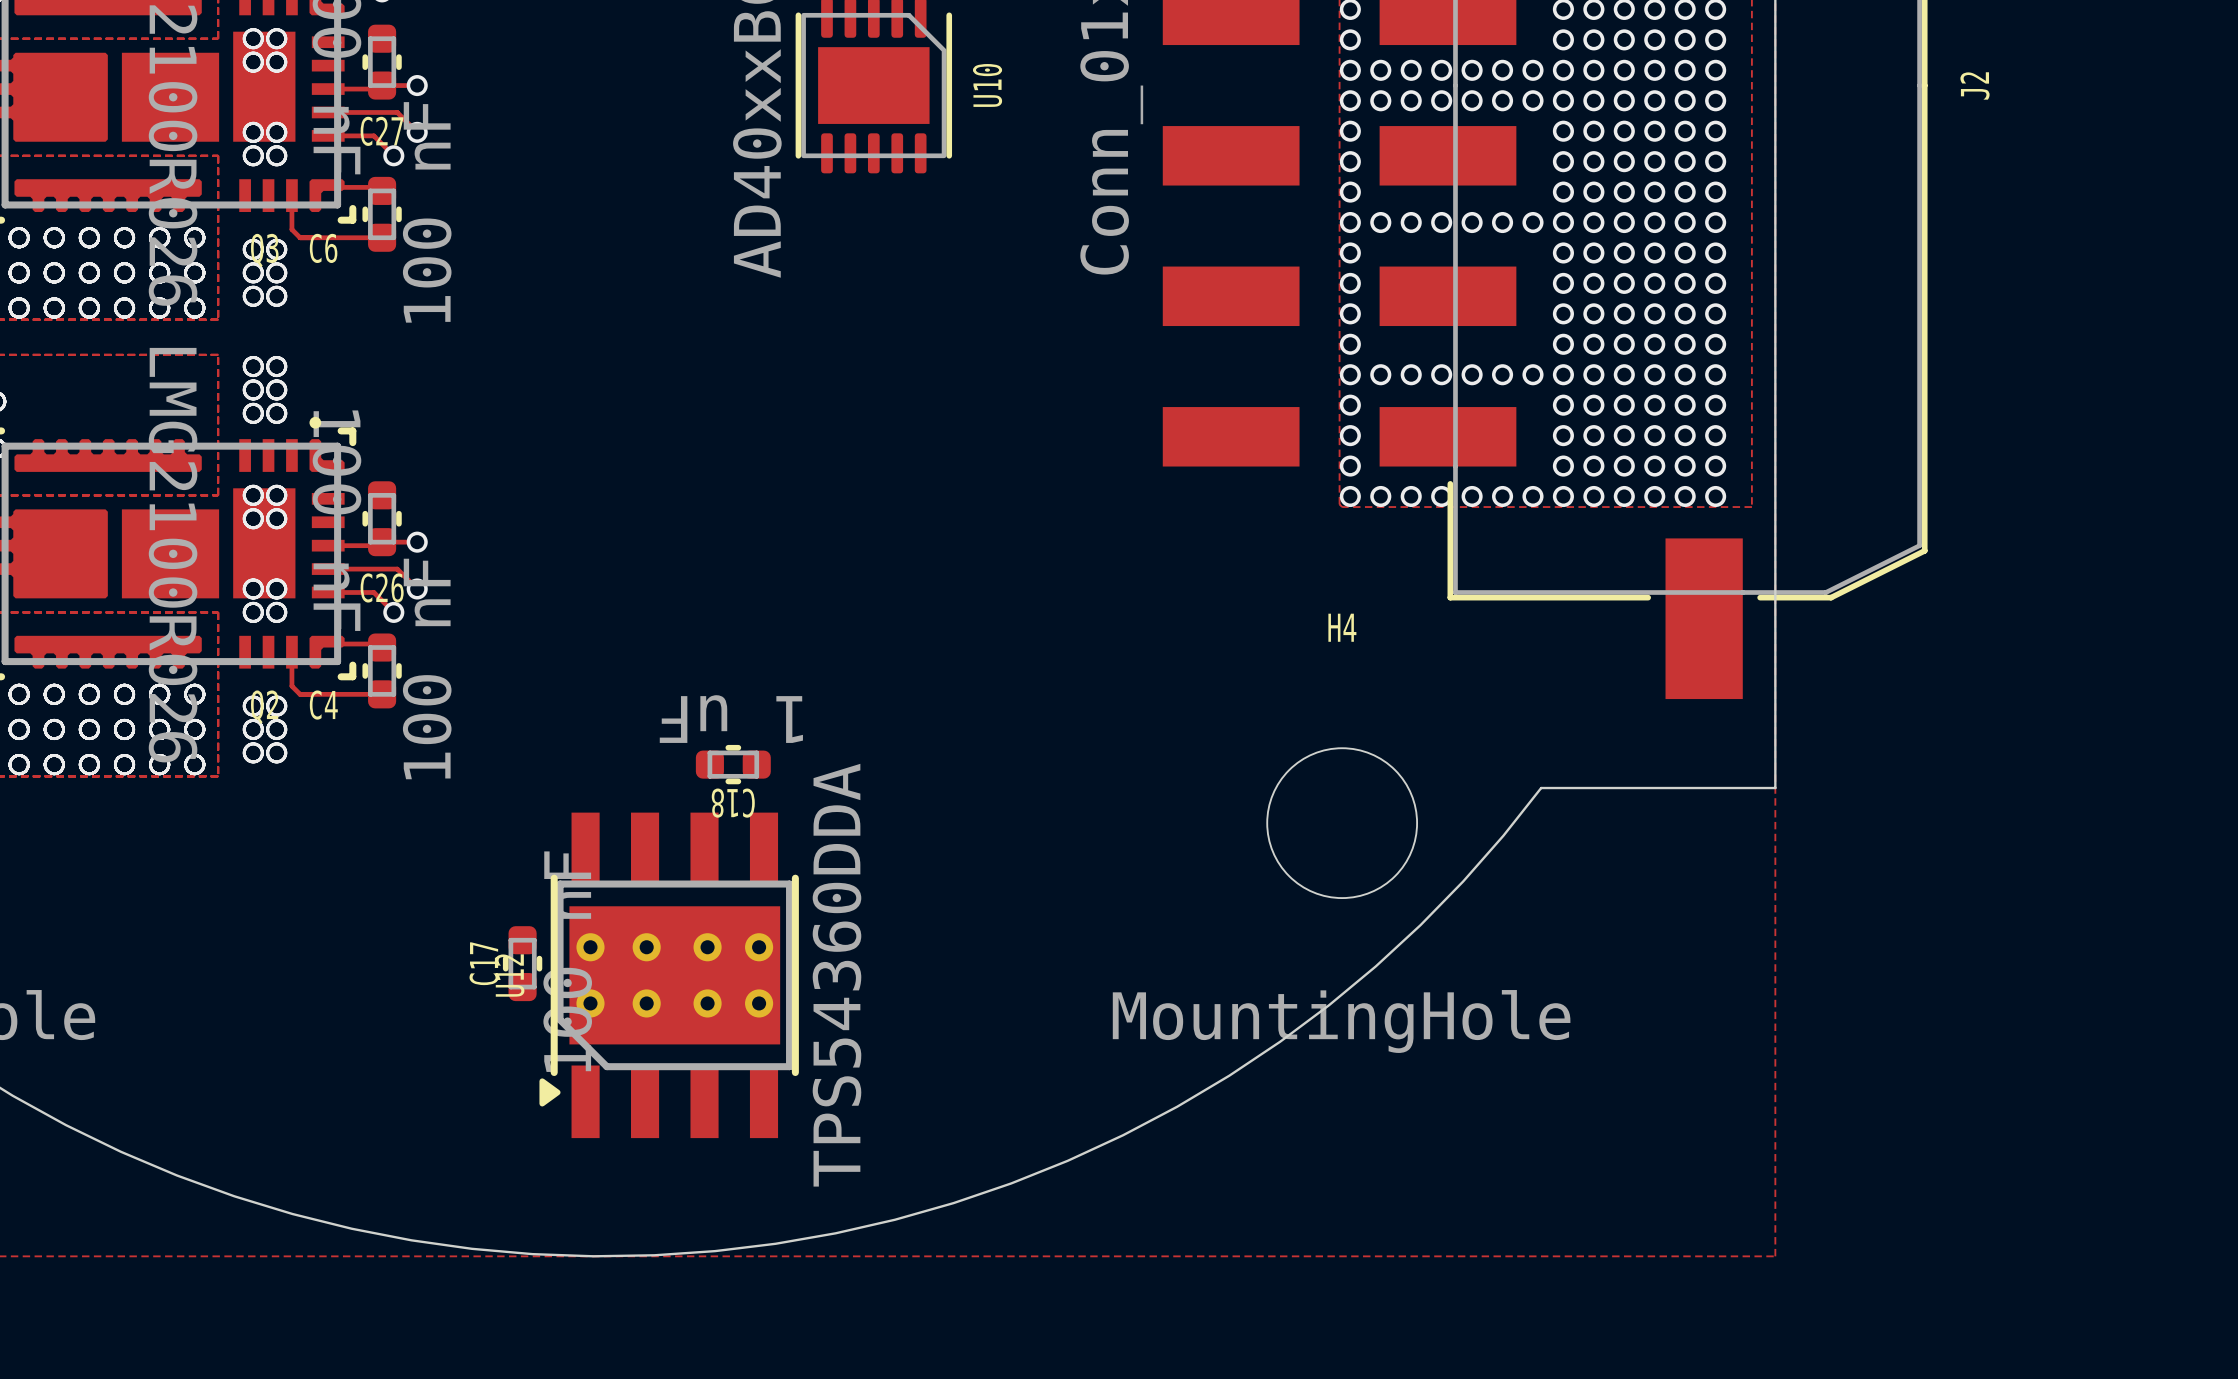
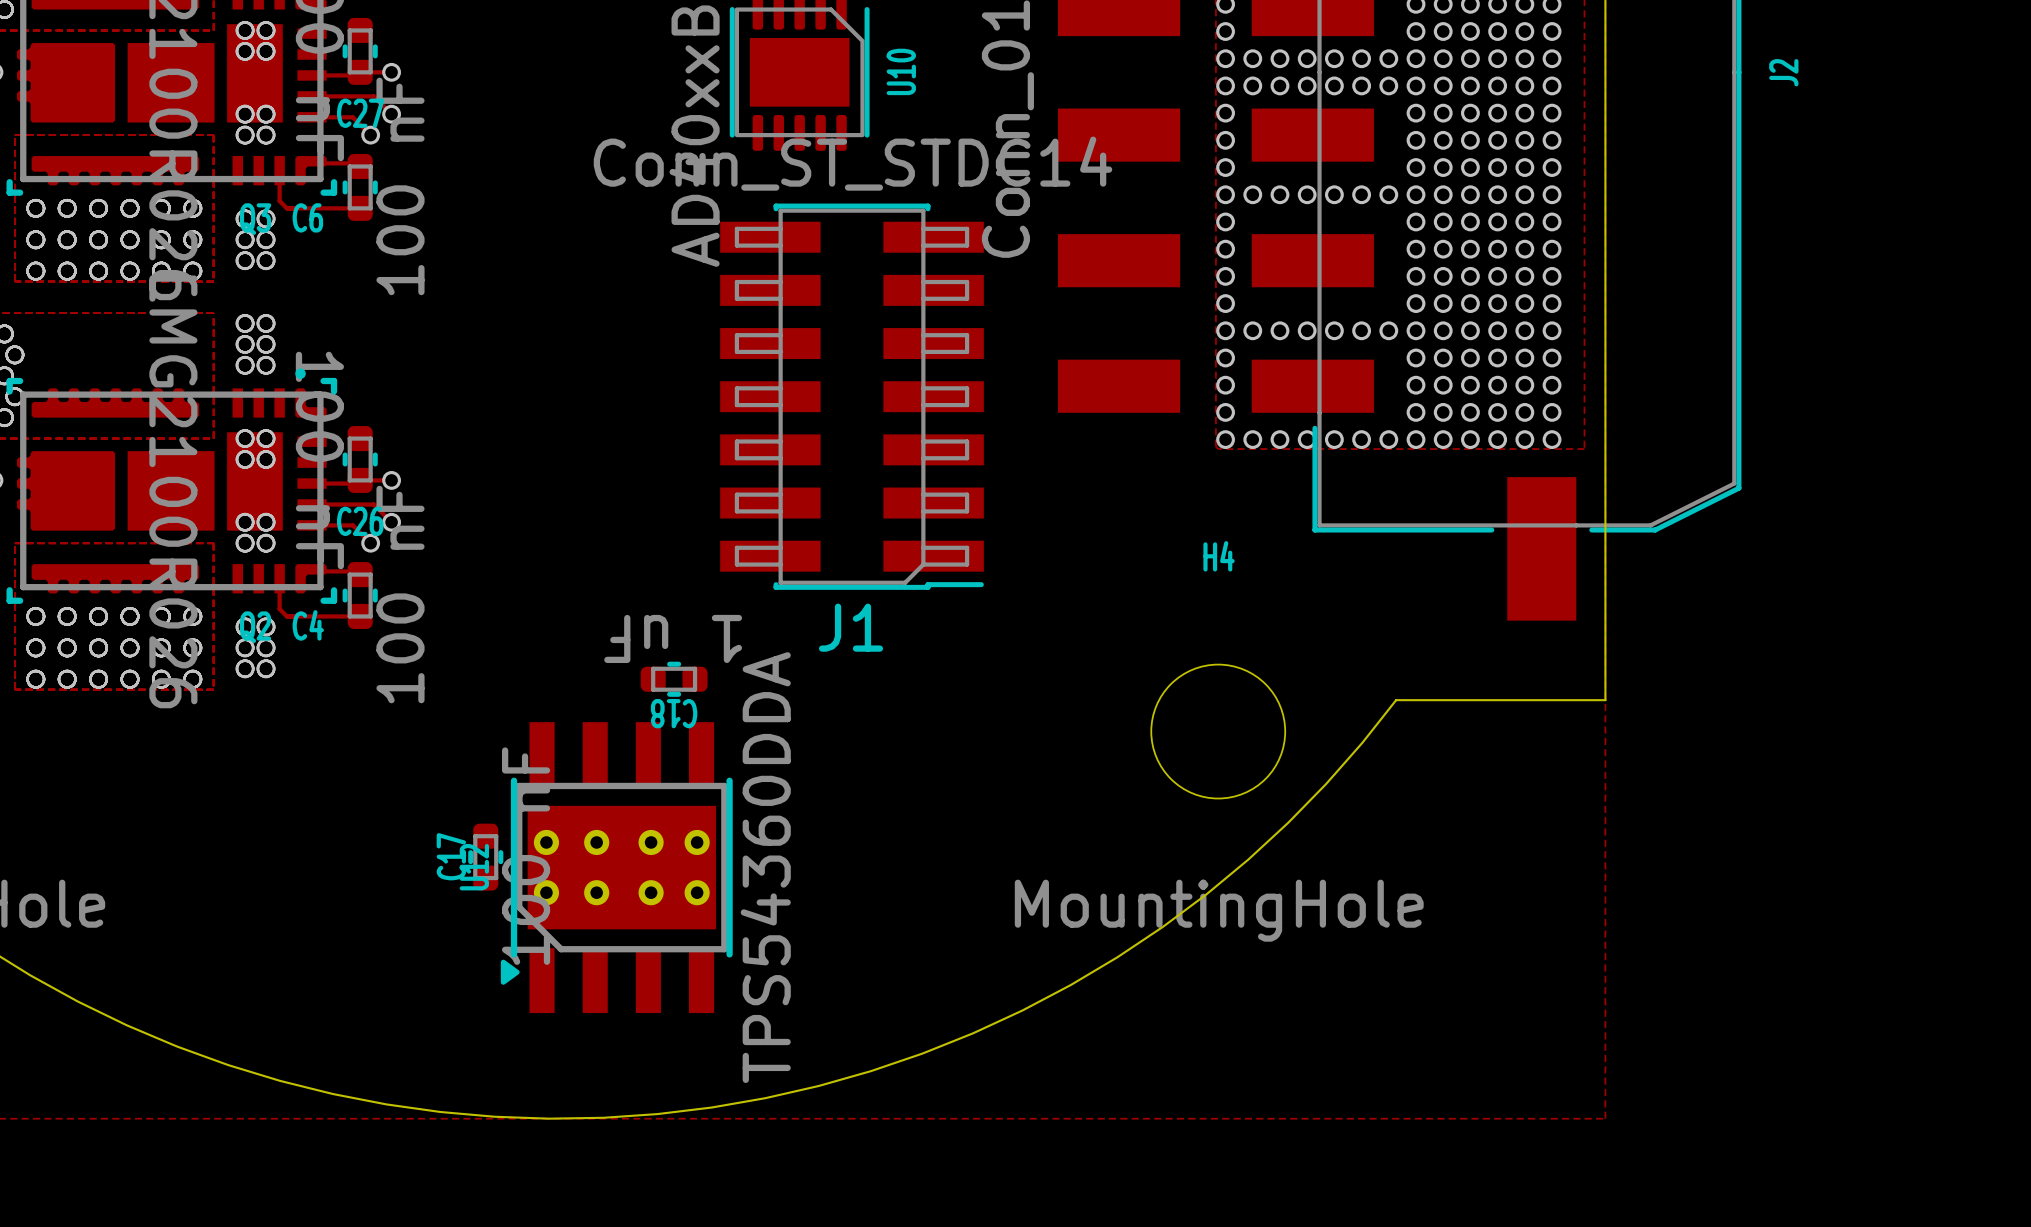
J1: none -> Conn_ST_STDC14 (852, 396)

